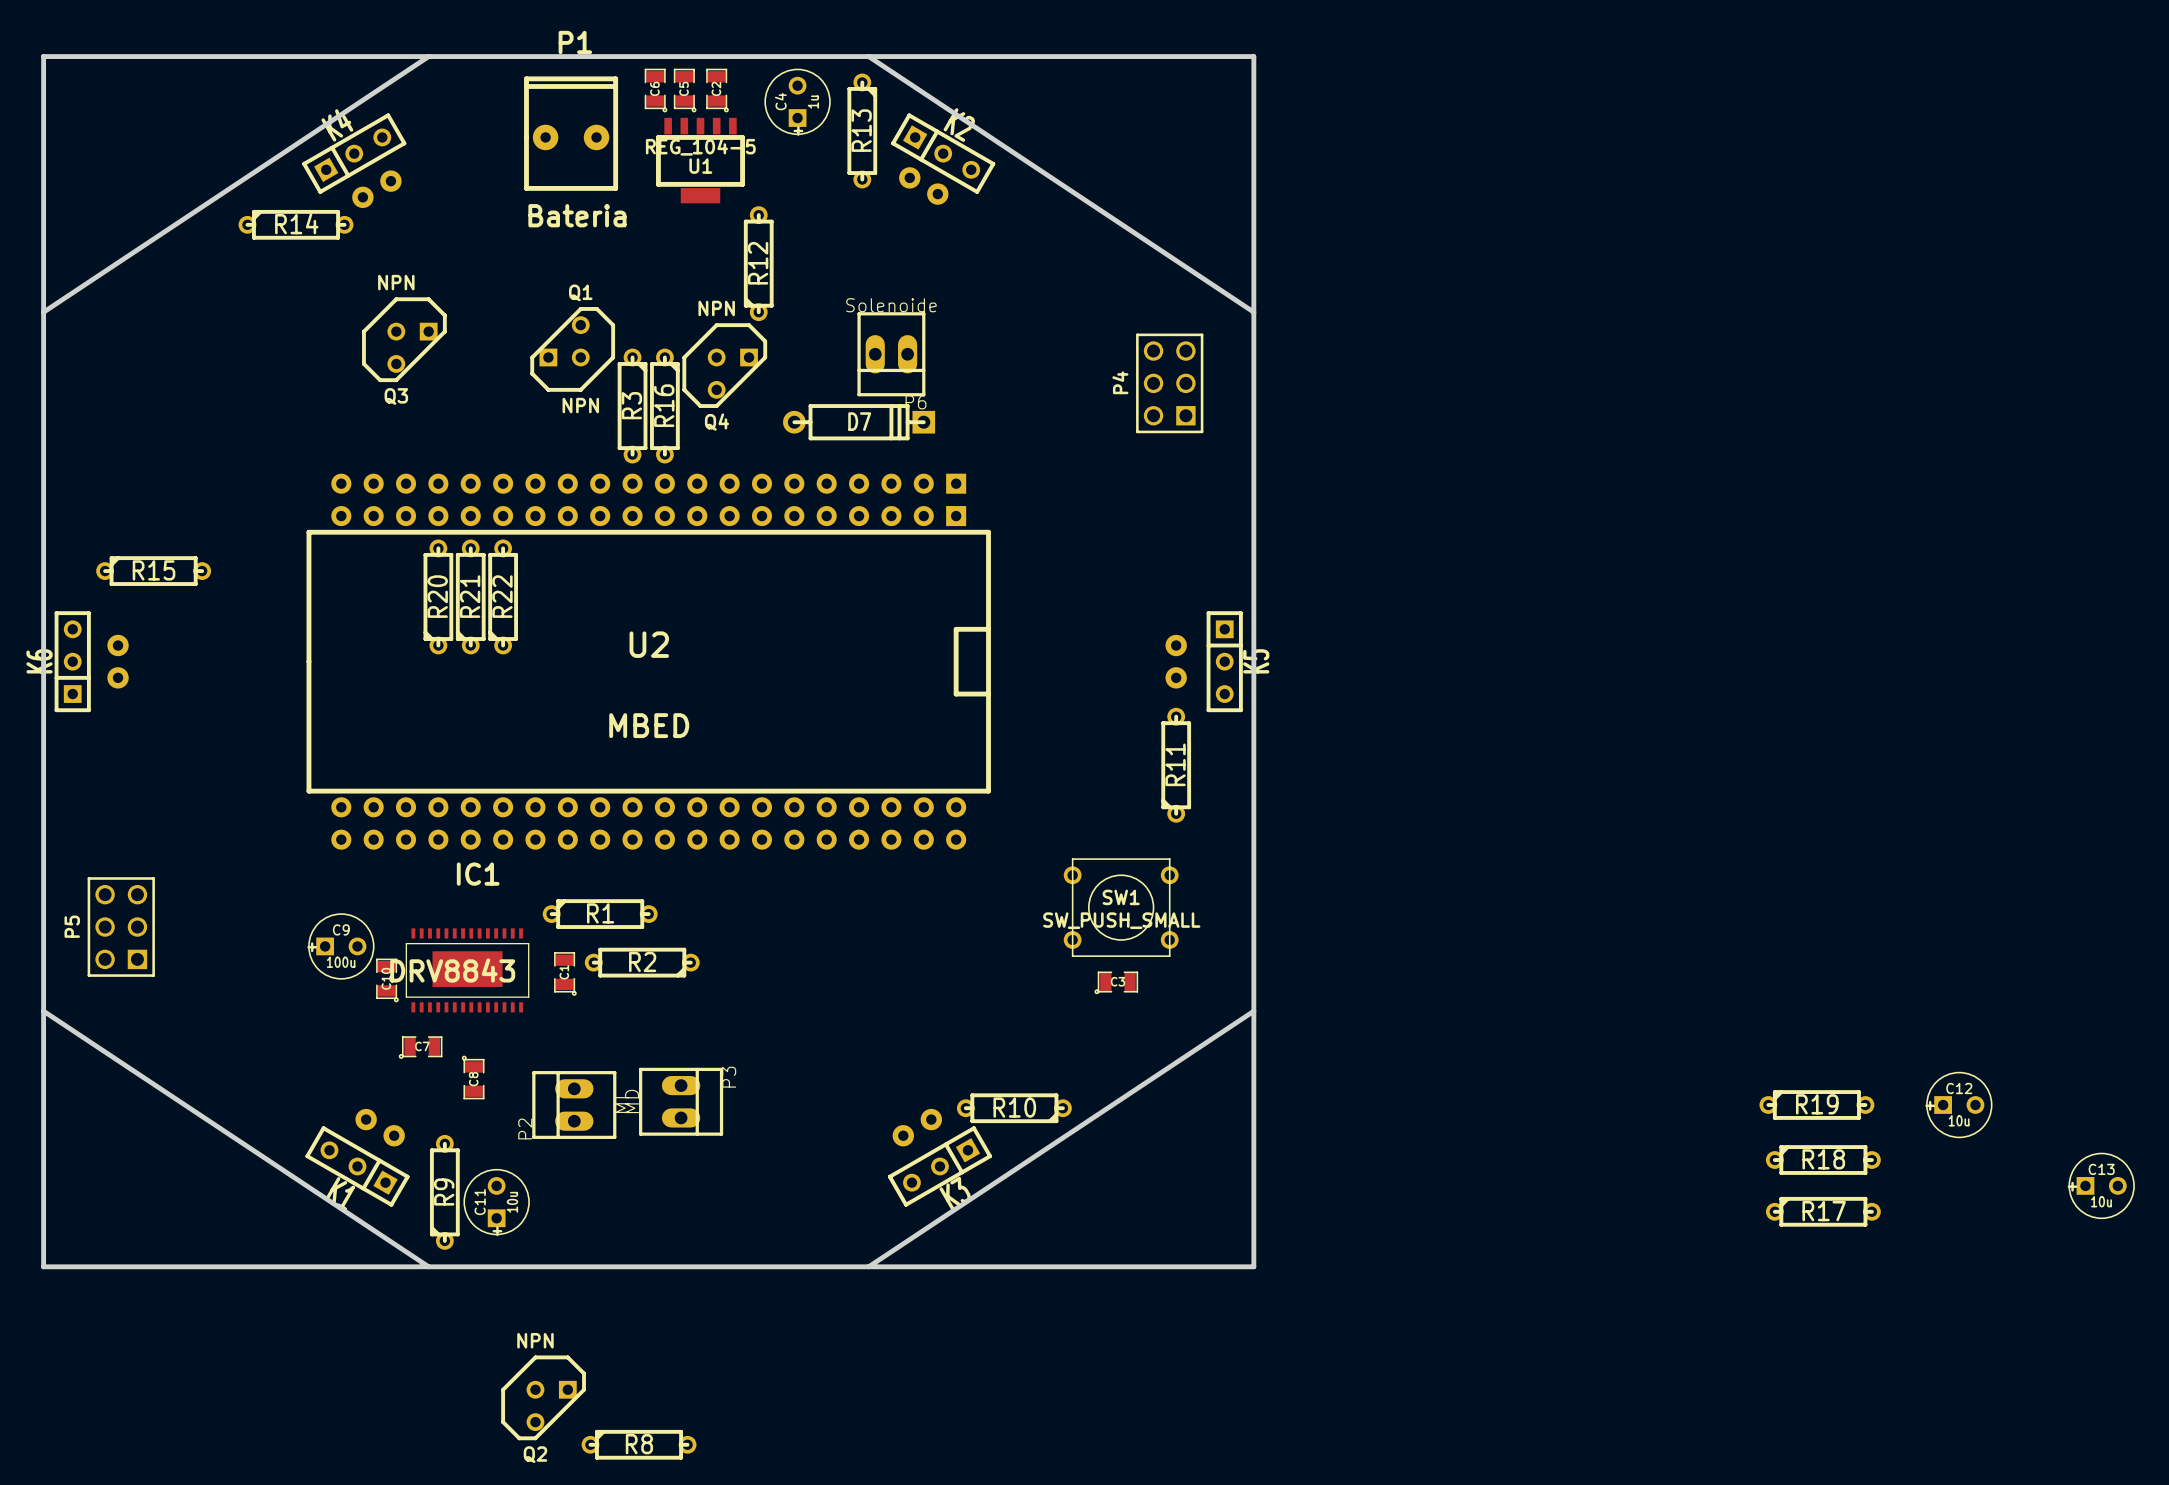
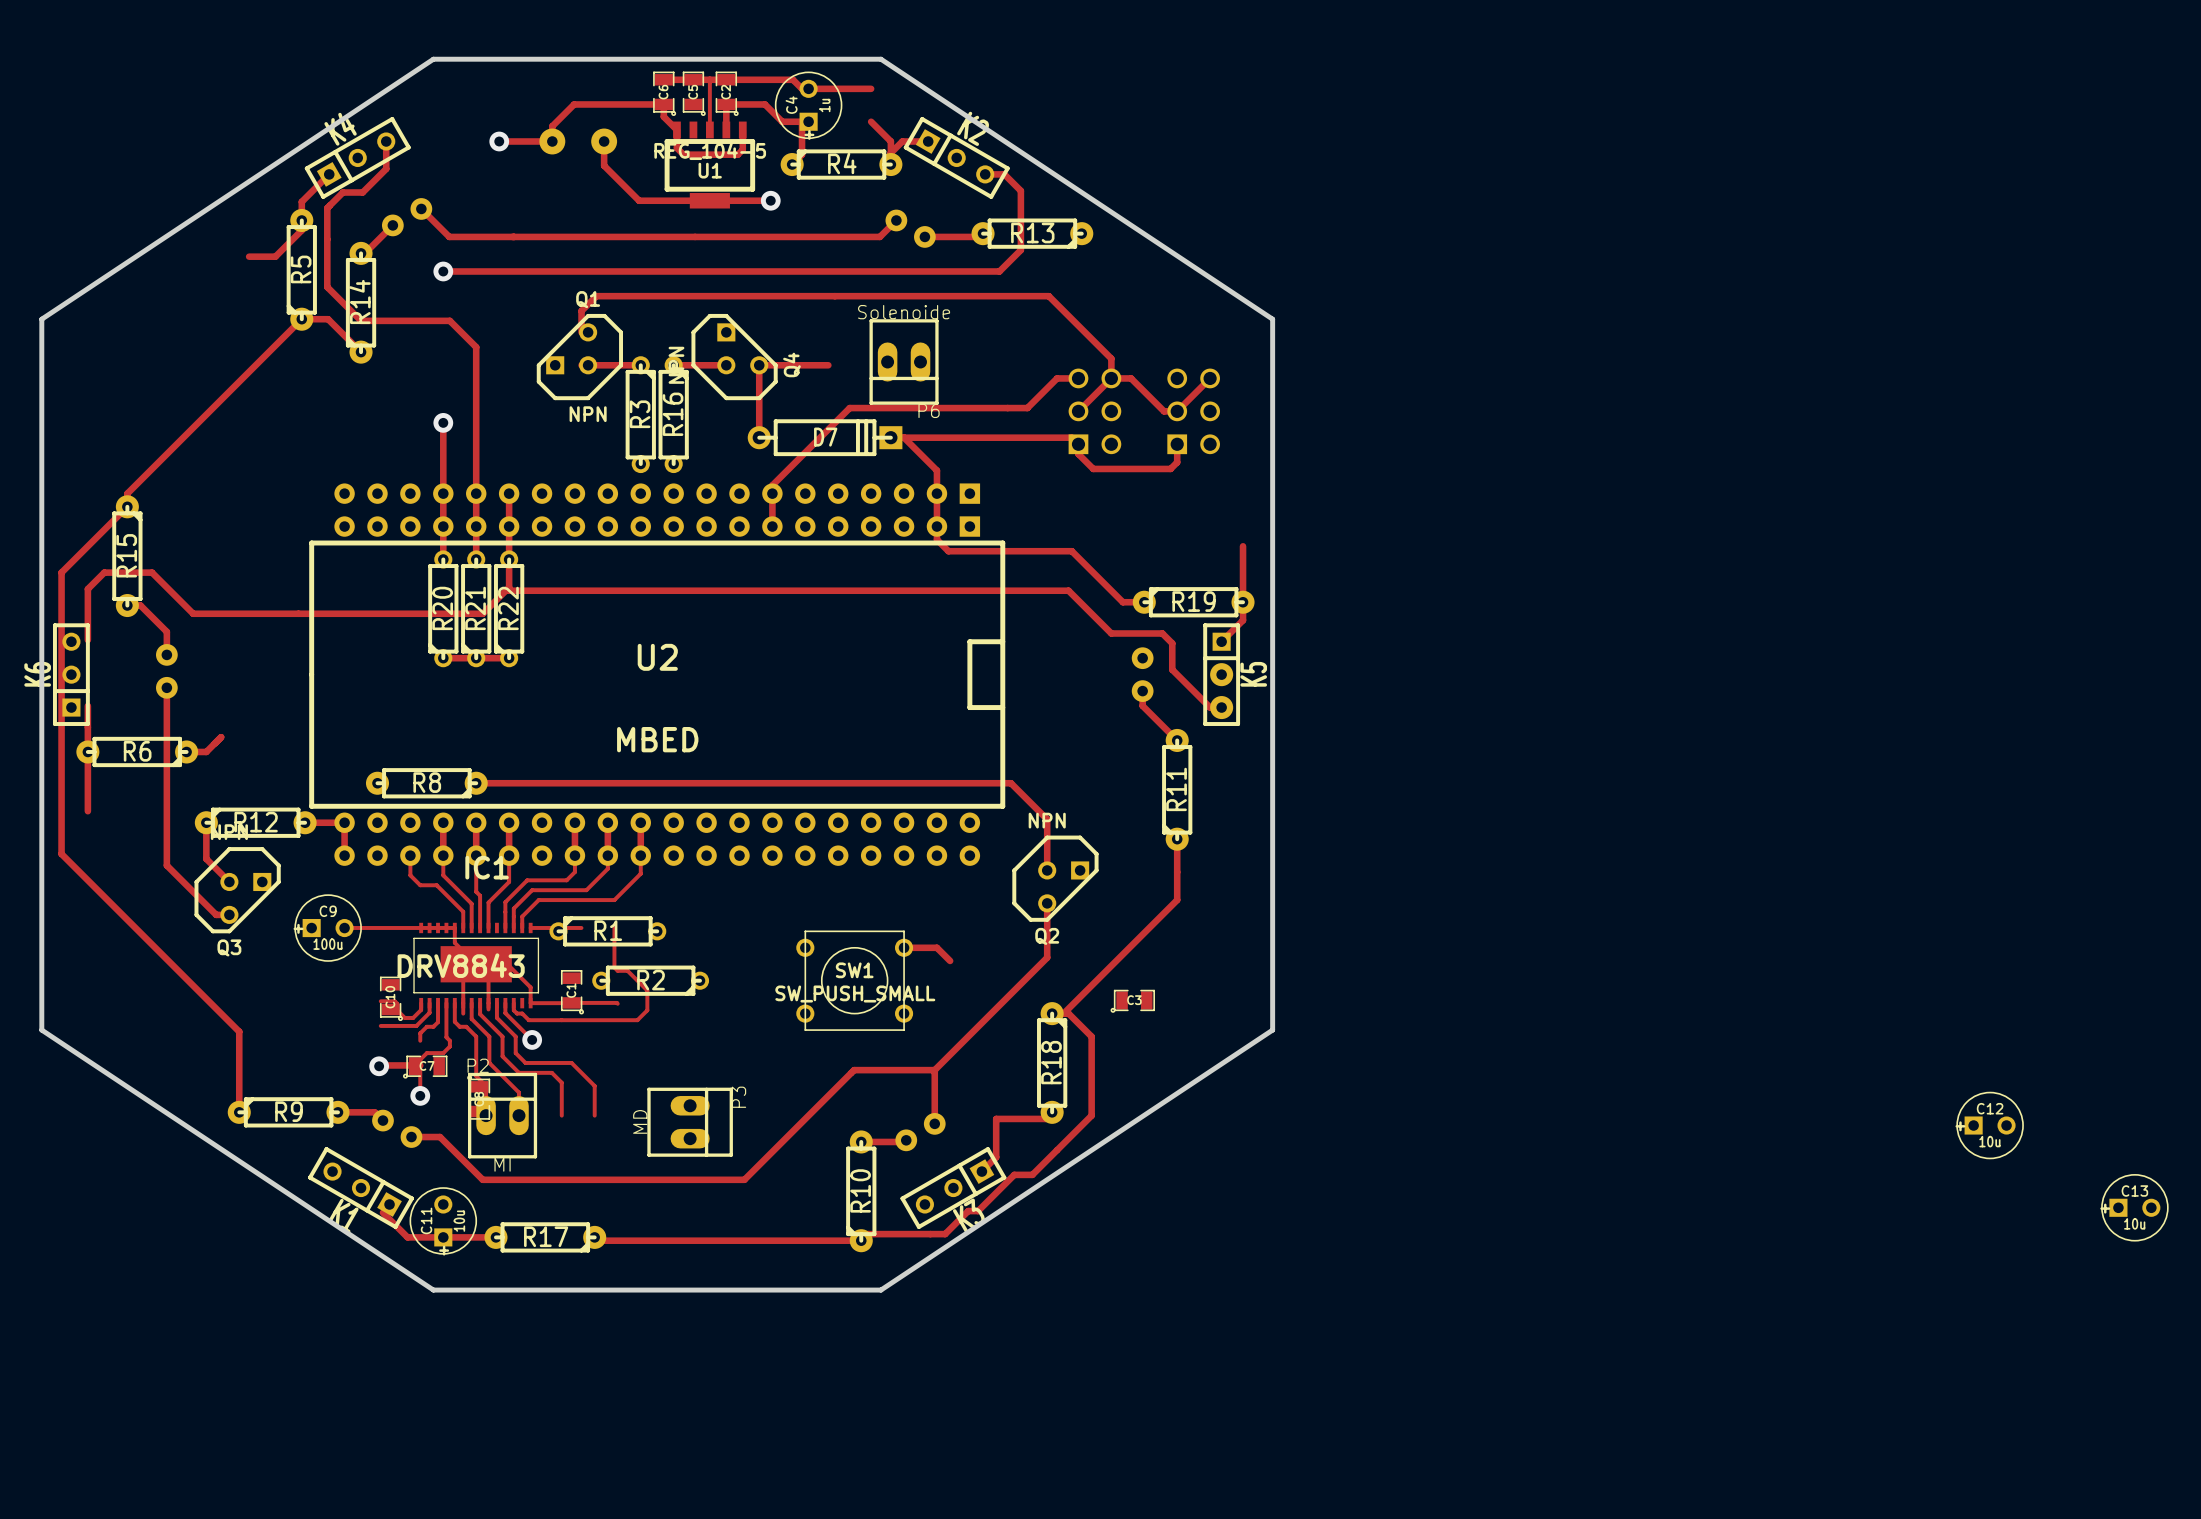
board edge: (428, 56) (43, 56) (43, 312) -> none
board edge: (868, 56) (1253, 56) (1253, 312) -> none
R13 footprint: [847, 73, 878, 189] -> [971, 218, 1094, 249]
track: none -> (663, 79) (792, 79) (802, 88) (871, 88)
track: none -> (709, 79) (709, 129)
track: none -> (871, 121) (890, 141) (890, 164)
track: none -> (726, 129) (726, 104) (765, 104) (782, 121) (802, 121) (802, 154) (792, 164)
track: none -> (742, 129) (742, 149) (737, 154) (683, 154) (676, 148) (676, 129) (663, 116) (663, 104) (574, 104) (552, 126) (552, 141) (499, 141)
P1 side: top (571, 133) -> bottom (578, 141)
track: none -> (386, 141) (386, 168) (362, 192) (342, 192) (327, 208) (327, 287) (361, 320) (449, 320) (476, 347) (476, 559)
via: none -> (499, 141)
track: none -> (604, 141) (604, 165) (639, 200) (770, 200)
track: none -> (928, 141) (902, 141) (890, 153)
R4: none -> (841, 164)
track: none -> (329, 174) (301, 201) (301, 230) (275, 256) (249, 256)
track: none -> (985, 174) (1004, 174) (1020, 190) (1020, 250) (999, 271) (443, 271)
part position: (923, 185) -> (910, 228)
part position: (376, 189) -> (407, 217)
via: none -> (770, 200)
track: none -> (421, 208) (449, 236) (879, 236) (896, 220)
R12 footprint: [743, 206, 774, 322] -> [194, 807, 317, 838]
R14 footprint: [238, 209, 354, 240] -> [345, 241, 377, 364]
track: none -> (392, 225) (364, 253) (361, 253)
track: none -> (983, 233) (979, 236) (924, 236)
R5: none -> (301, 269)
via: none -> (443, 271)
track: none -> (581, 332) (581, 310) (596, 296) (1048, 296) (1111, 358) (1111, 378)
Q3 position: (404, 339) -> (237, 890)
track: none -> (361, 352) (328, 319) (301, 319) (127, 493) (127, 506) (61, 572) (61, 854) (239, 1031) (239, 1112)
track: none -> (581, 365) (640, 365)
track: none -> (673, 365) (726, 365)
track: none -> (828, 365) (759, 365) (759, 437)
Q4 rotation: 0° (724, 365) -> 90° counterclockwise (734, 357)
track: none -> (1078, 378) (1057, 378) (1027, 408) (849, 408) (772, 485) (772, 526)
track: none -> (1111, 378) (1131, 378) (1164, 411) (1177, 411) (1210, 378)
track: none -> (1111, 378) (1078, 411)
P4 side: top (1169, 383) -> bottom (1193, 411)
part: none -> (1094, 411)
track: none -> (443, 422) (443, 559)
via: none -> (443, 422)
D7 position: (859, 422) -> (825, 437)
track: none -> (890, 437) (1071, 437) (1078, 444) (1078, 454) (1093, 468) (1170, 468) (1177, 462) (1177, 444)
track: none -> (904, 437) (936, 470) (936, 539) (948, 551) (1071, 551) (1122, 602) (1144, 602)
track: none -> (509, 493) (509, 587) (482, 613) (193, 613) (152, 572) (104, 572) (87, 589) (87, 640)
track: none -> (1243, 546) (1243, 620) (1221, 641)
R15 footprint: [96, 556, 212, 586] -> [112, 495, 143, 618]
track: none -> (505, 590) (1068, 590) (1111, 633) (1162, 633) (1172, 643) (1172, 669) (1210, 707) (1221, 707)
track: none -> (127, 605) (140, 605) (166, 631) (166, 654)
K5 footprint: [1206, 611, 1243, 713] -> [1203, 623, 1241, 726]
track: none -> (443, 658) (509, 658)
part position: (118, 661) -> (166, 671)
part position: (1176, 661) -> (1142, 674)
track: none -> (166, 687) (166, 865) (216, 914) (229, 914)
track: none -> (1142, 691) (1142, 705) (1177, 740)
track: none -> (87, 705) (87, 811)
R11 footprint: [1161, 707, 1192, 823] -> [1162, 728, 1193, 851]
track: none -> (221, 737) (206, 751) (186, 751)
R6: none -> (137, 751)
track: none -> (476, 783) (1011, 783) (1047, 819) (1047, 870)
track: none -> (206, 822) (206, 858) (229, 881)
track: none -> (305, 822) (344, 822) (344, 855)
track: none -> (443, 822) (443, 875) (471, 903) (471, 927)
track: none -> (476, 822) (476, 891) (480, 895) (480, 927)
track: none -> (509, 822) (509, 881) (488, 902) (488, 927)
track: none -> (574, 822) (574, 872) (566, 880) (527, 880) (505, 902) (505, 927)
track: none -> (607, 822) (607, 868) (586, 890) (532, 890) (513, 908) (513, 927)
track: none -> (640, 822) (640, 873) (614, 900) (538, 900) (522, 916) (522, 927)
track: none -> (1177, 839) (1177, 900) (1063, 1013)
track: none -> (410, 855) (410, 875) (420, 885) (436, 885) (463, 911) (463, 927)
track: none -> (1047, 903) (1047, 957) (934, 1070)
SW1 position: (1121, 907) -> (854, 980)
track: none -> (344, 927) (454, 927) (454, 942) (488, 976) (488, 1009)
track: none -> (530, 927) (581, 927)
track: none -> (614, 928) (614, 967) (617, 970) (627, 970) (647, 990) (647, 1010) (637, 1020) (528, 1020) (522, 1013) (517, 1013) (513, 1010) (513, 1003)
P5: (121, 927) -> none
track: none -> (904, 947) (936, 947) (950, 960)
C9 position: (341, 946) -> (328, 928)
IC1 position: (467, 970) -> (476, 965)
track: none -> (380, 1001) (394, 1001) (397, 1003) (397, 1010) (404, 1017) (413, 1017) (421, 1009) (421, 1003)
track: none -> (429, 1003) (429, 1012) (416, 1025) (380, 1025)
track: none -> (438, 1003) (438, 1022) (433, 1026) (426, 1026) (420, 1033) (420, 1040)
track: none -> (446, 1003) (446, 1037) (449, 1040) (449, 1046) (443, 1053) (426, 1053) (420, 1059) (420, 1095)
track: none -> (454, 1003) (454, 1021) (459, 1026) (466, 1026) (476, 1036) (476, 1076) (486, 1086) (486, 1115)
track: none -> (471, 1003) (471, 1018) (489, 1036) (489, 1062) (519, 1092) (519, 1115)
track: none -> (480, 1003) (480, 1014) (502, 1036) (502, 1056) (519, 1072) (551, 1072) (561, 1082) (561, 1115)
track: none -> (496, 1003) (496, 1017) (515, 1036) (515, 1053) (525, 1062) (571, 1062) (594, 1086) (594, 1115)
track: none -> (505, 1003) (505, 1013) (532, 1039)
track: none -> (617, 1003) (530, 1003) (530, 987) (507, 964) (476, 964) (463, 977) (463, 1013)
track: none -> (1052, 1013) (1068, 1013) (1091, 1036) (1091, 1115) (1032, 1174) (1014, 1174) (978, 1211) (968, 1211) (945, 1234) (867, 1234) (861, 1240) (597, 1240) (594, 1237)
board edge: (43, 1011) (43, 1266) (428, 1266) -> none
board edge: (1253, 1011) (1253, 1266) (868, 1266) -> none
via: none -> (532, 1039)
track: none -> (420, 1065) (379, 1066)
via: none -> (379, 1066)
track: none -> (934, 1070) (854, 1070) (744, 1179) (482, 1179) (440, 1137) (411, 1137)
track: none -> (934, 1070) (934, 1123)
via: none -> (420, 1095)
R19 footprint: [1759, 1090, 1875, 1120] -> [1132, 587, 1255, 618]
track: none -> (337, 1112) (374, 1112) (382, 1120)
track: none -> (1052, 1112) (1045, 1118) (996, 1118) (996, 1157) (981, 1171)
R10 footprint: [956, 1093, 1072, 1124] -> [846, 1130, 877, 1253]
P2 rotation: 0° (574, 1105) -> 90° clockwise (502, 1115)
P2 position: (574, 1105) -> (502, 1115)
track: none -> (906, 1140) (904, 1141) (861, 1141)
part position: (380, 1127) -> (397, 1128)
part position: (917, 1127) -> (920, 1132)
R9 footprint: [429, 1134, 460, 1250] -> [227, 1097, 350, 1128]
R18 footprint: [1765, 1145, 1881, 1175] -> [1037, 1002, 1068, 1124]
track: none -> (382, 1212) (407, 1237) (495, 1237)
R17 footprint: [1765, 1196, 1881, 1227] -> [484, 1222, 607, 1253]
C11 position: (496, 1202) -> (443, 1220)
Q2 position: (543, 1397) -> (1055, 878)
R8 footprint: [581, 1429, 697, 1460] -> [365, 768, 488, 799]

